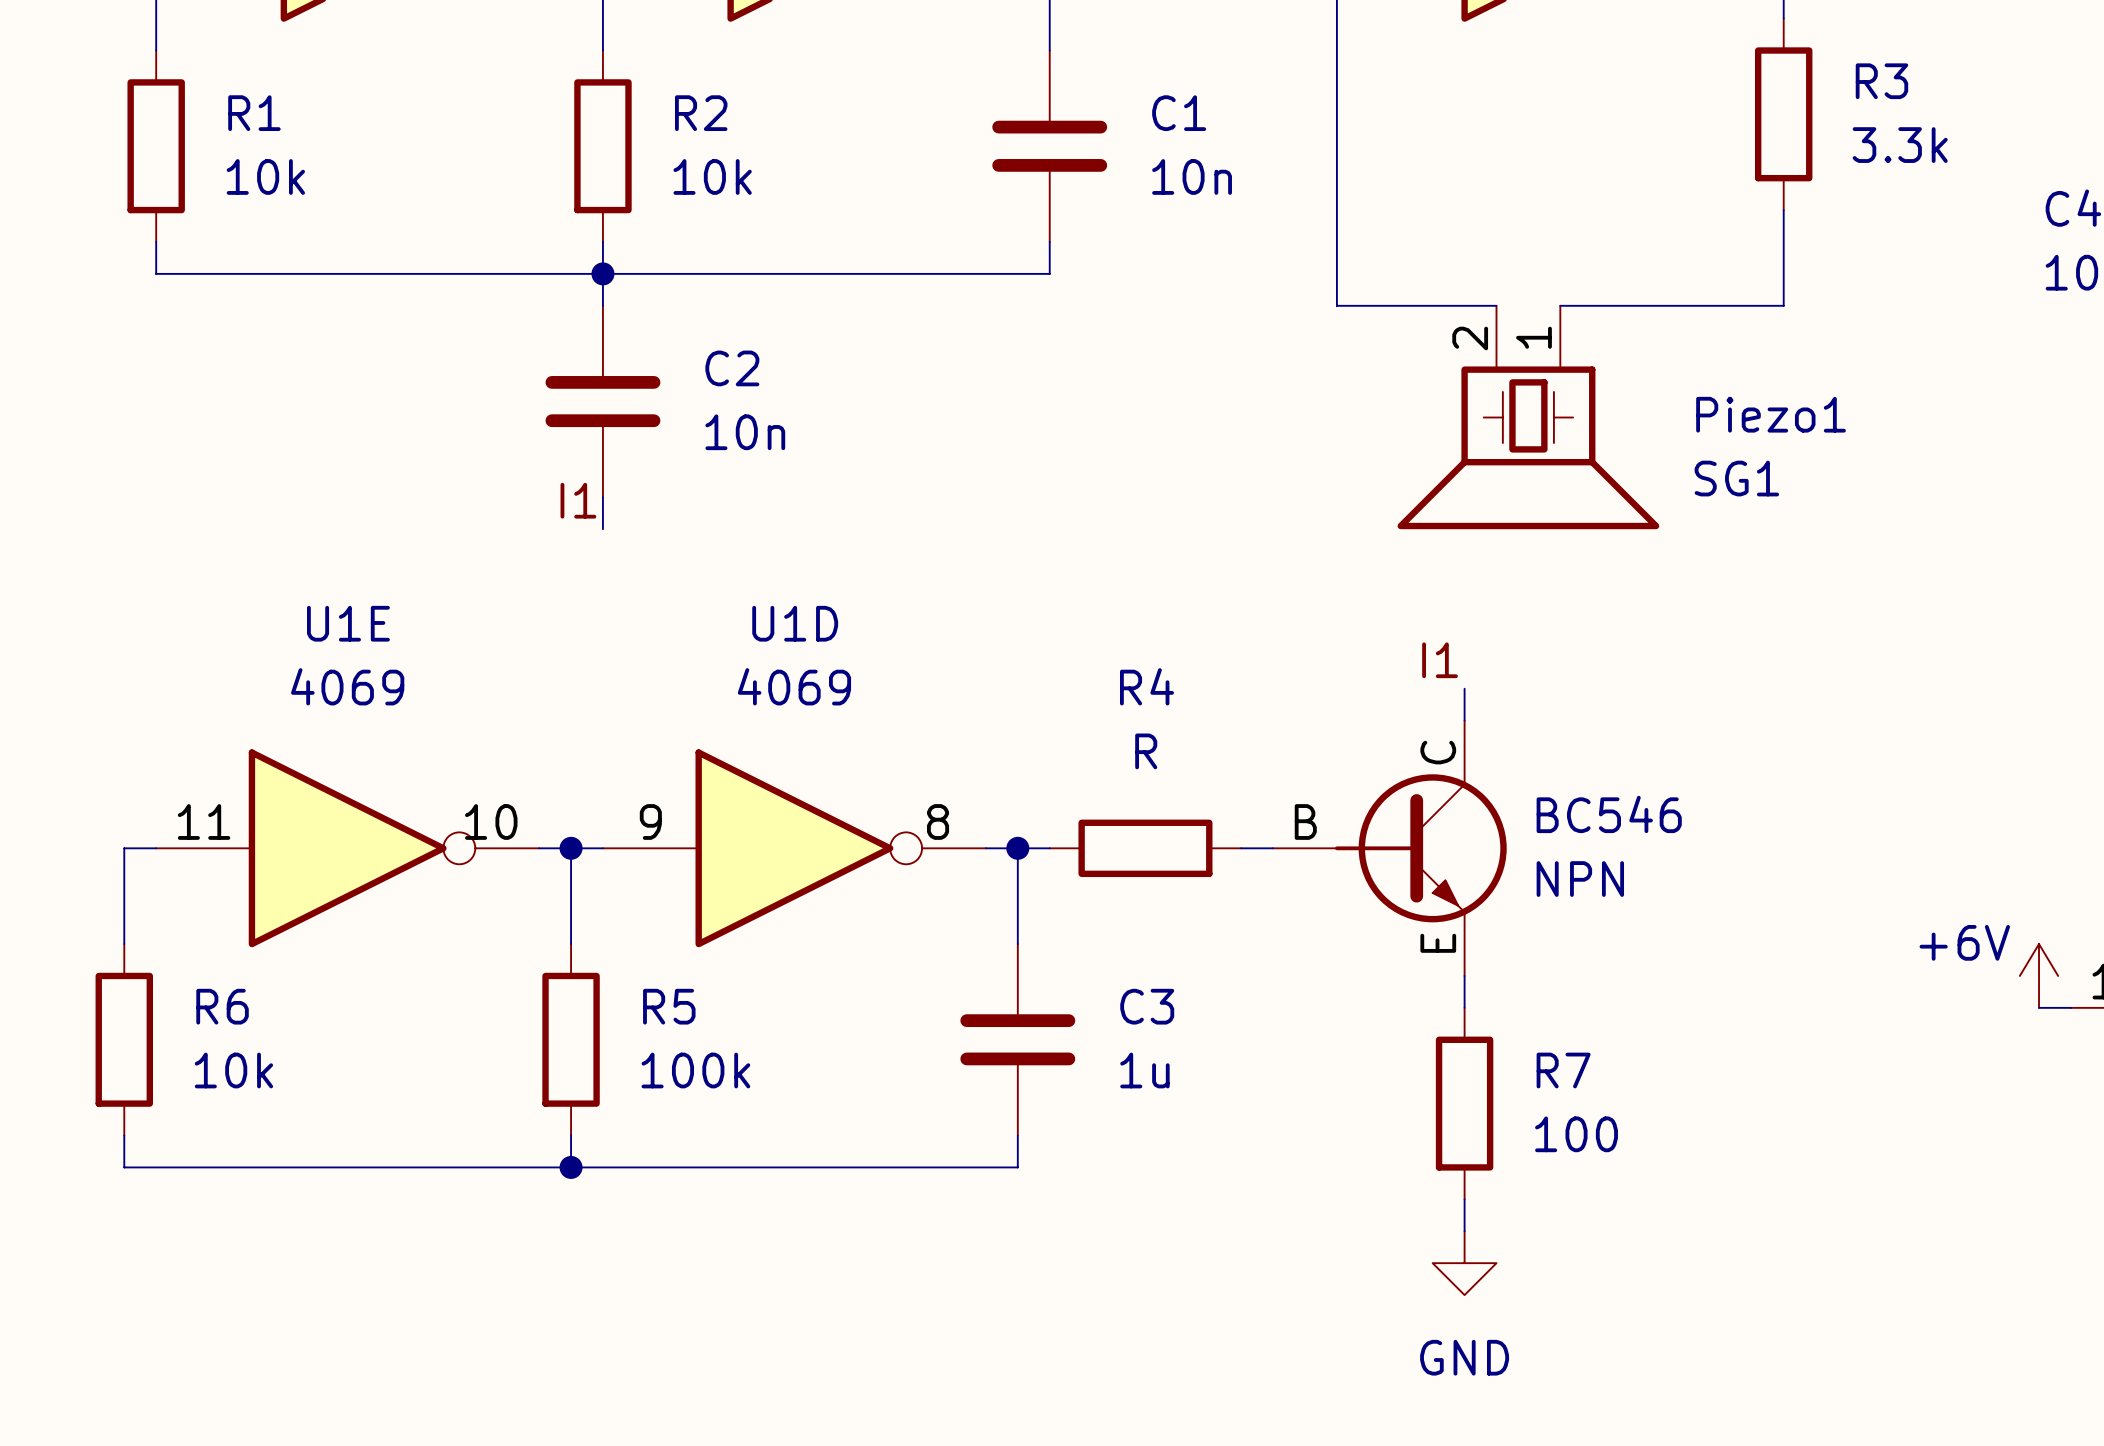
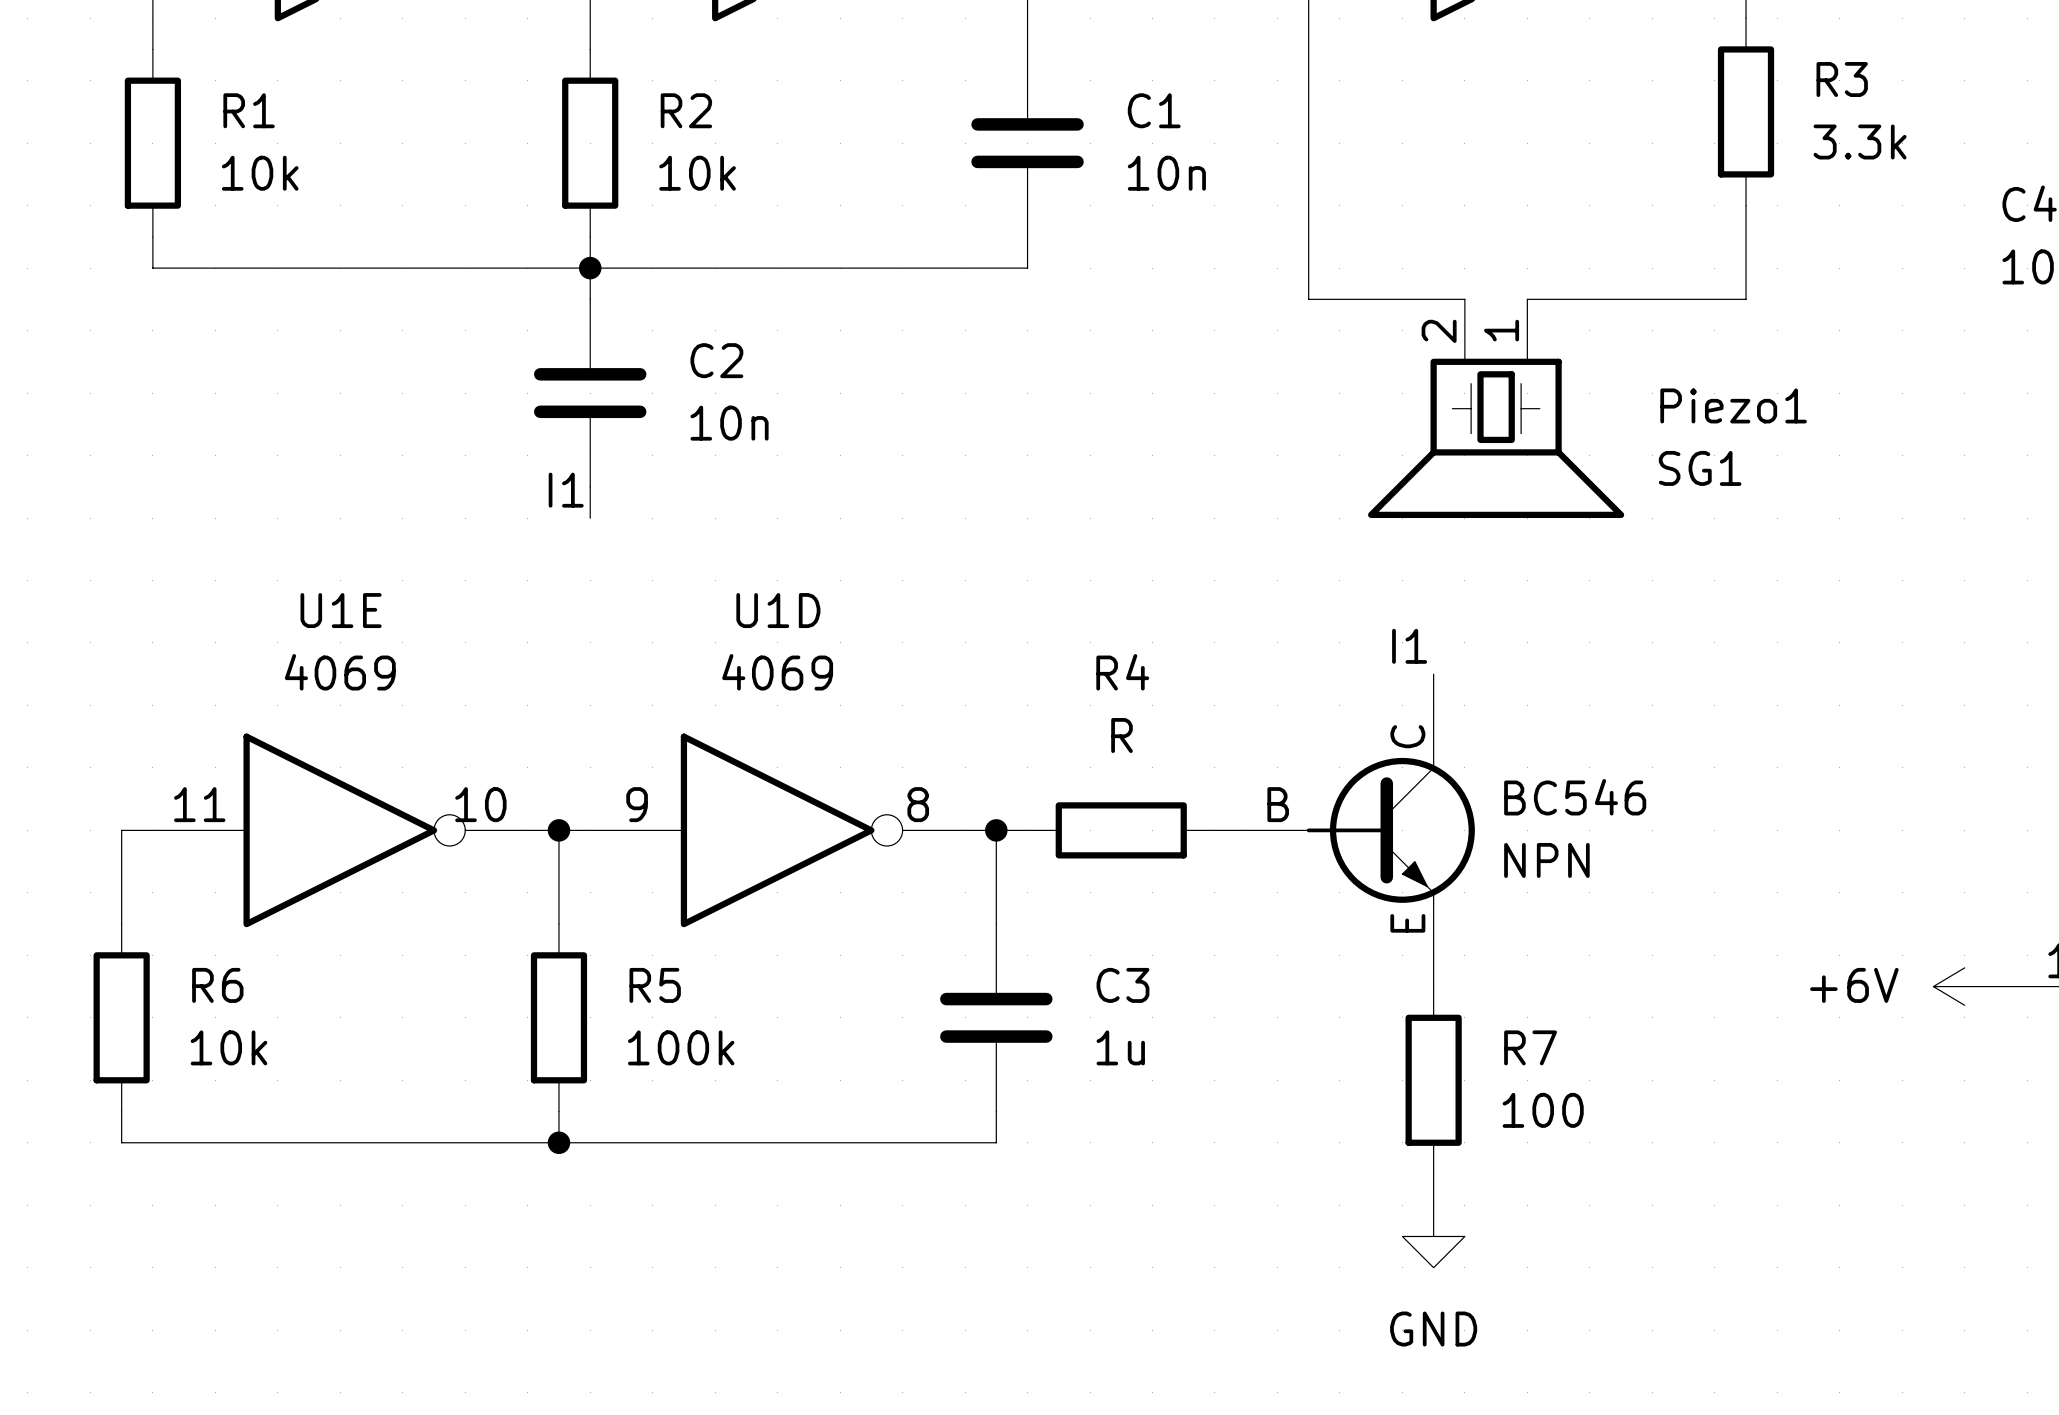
power symbol text position: +6V (1964, 942) -> +6V (1854, 985)
power symbol rotation: 0° (2039, 975) -> 90° counterclockwise (1964, 986)
power symbol position: +6V (2039, 975) -> +6V (1964, 986)

